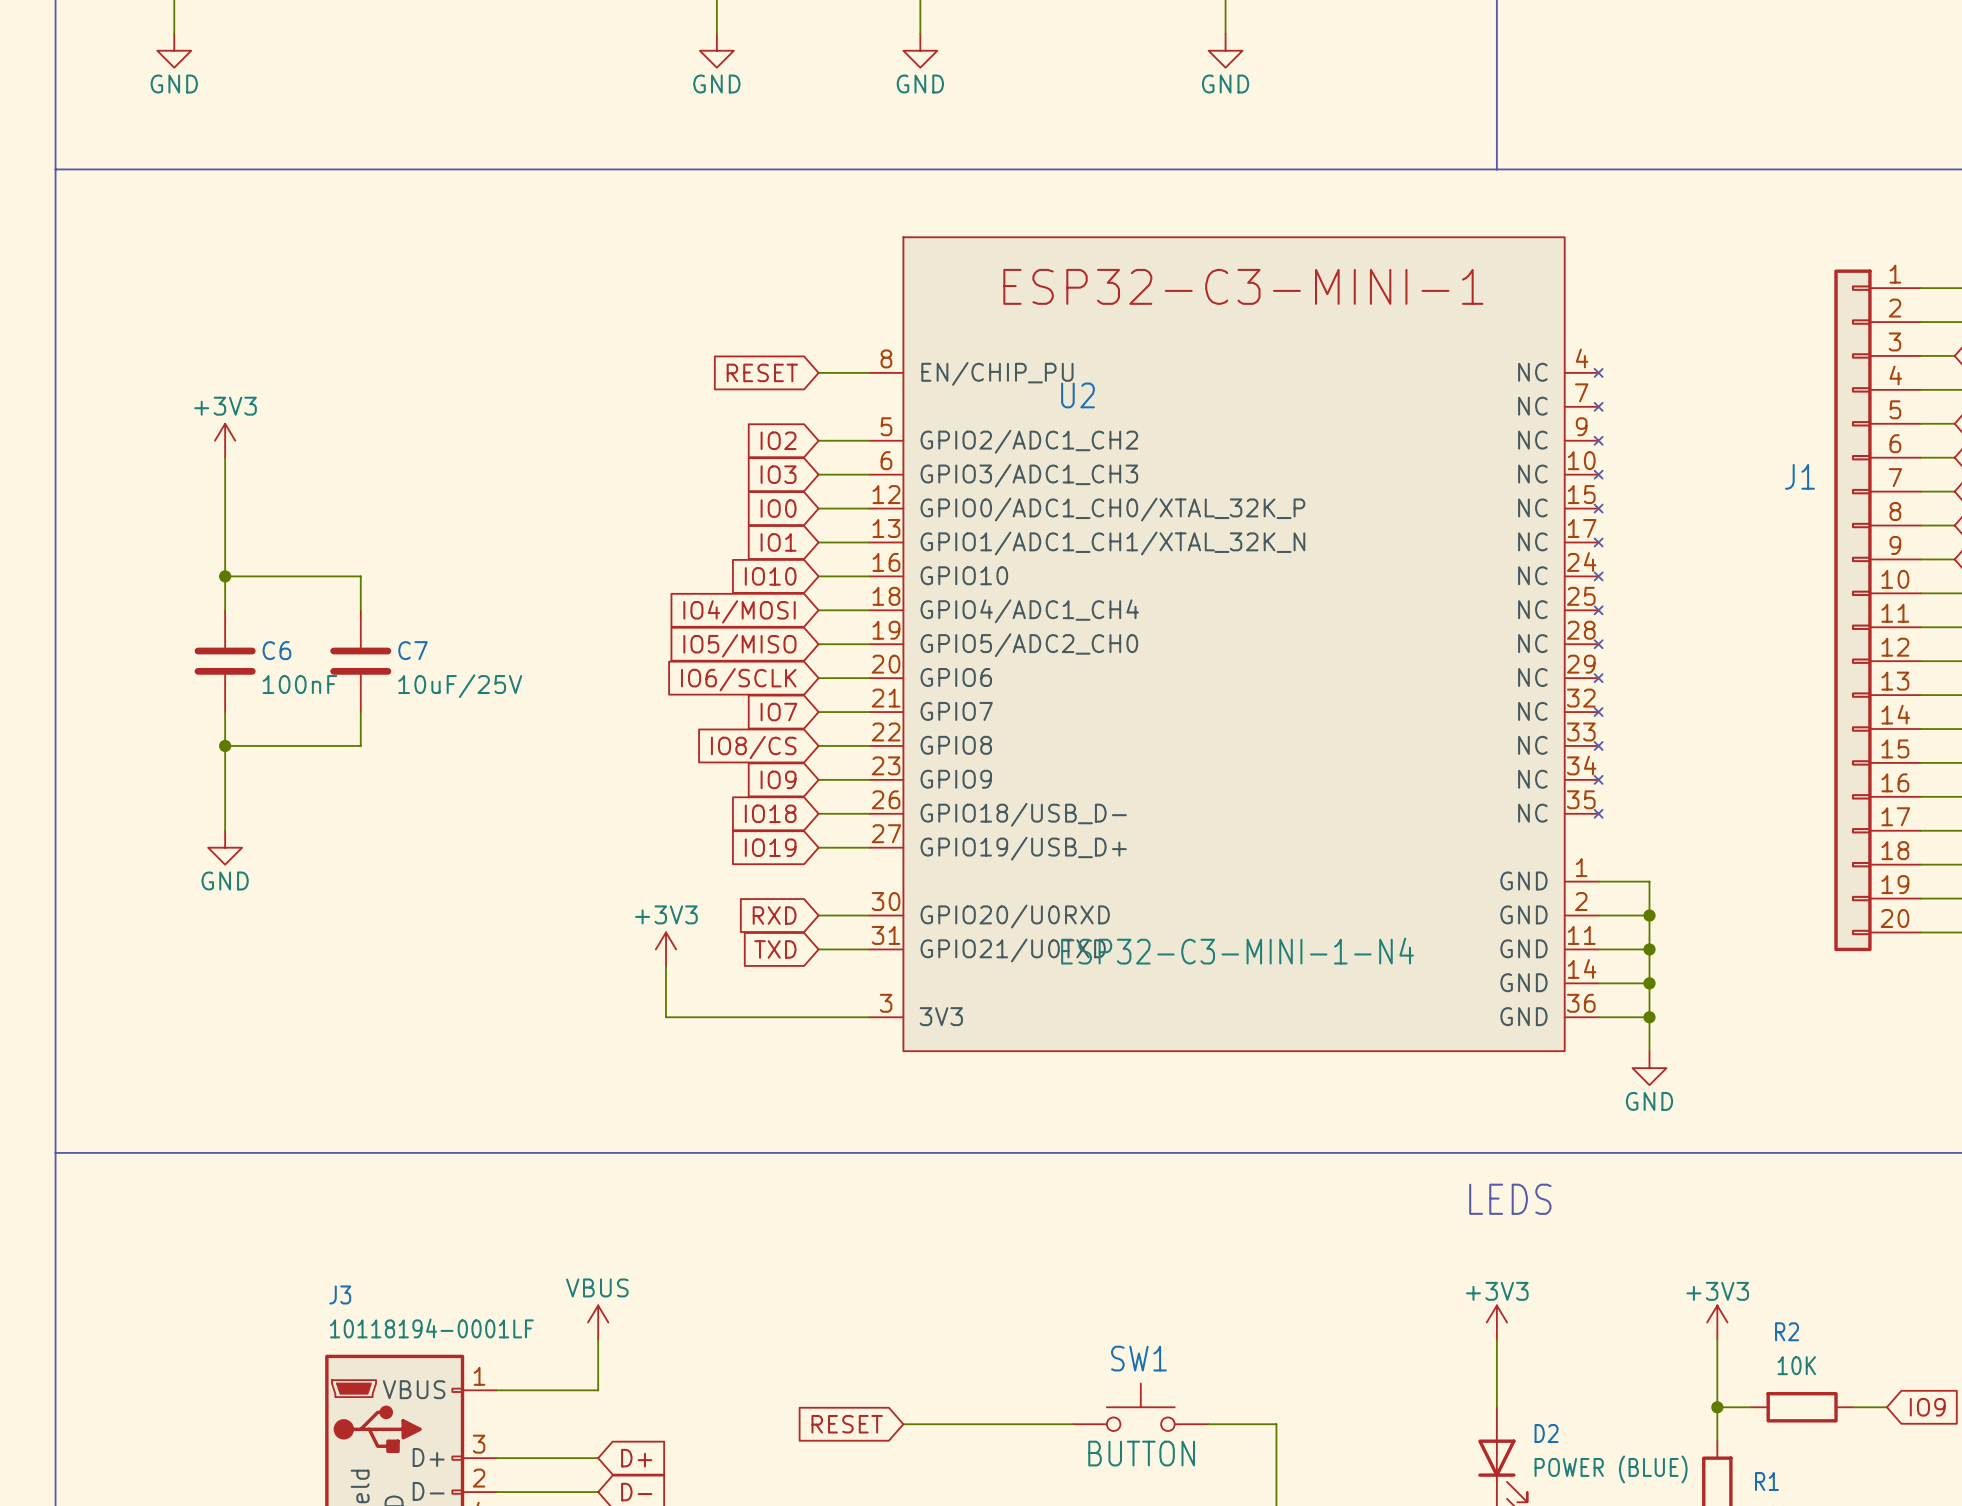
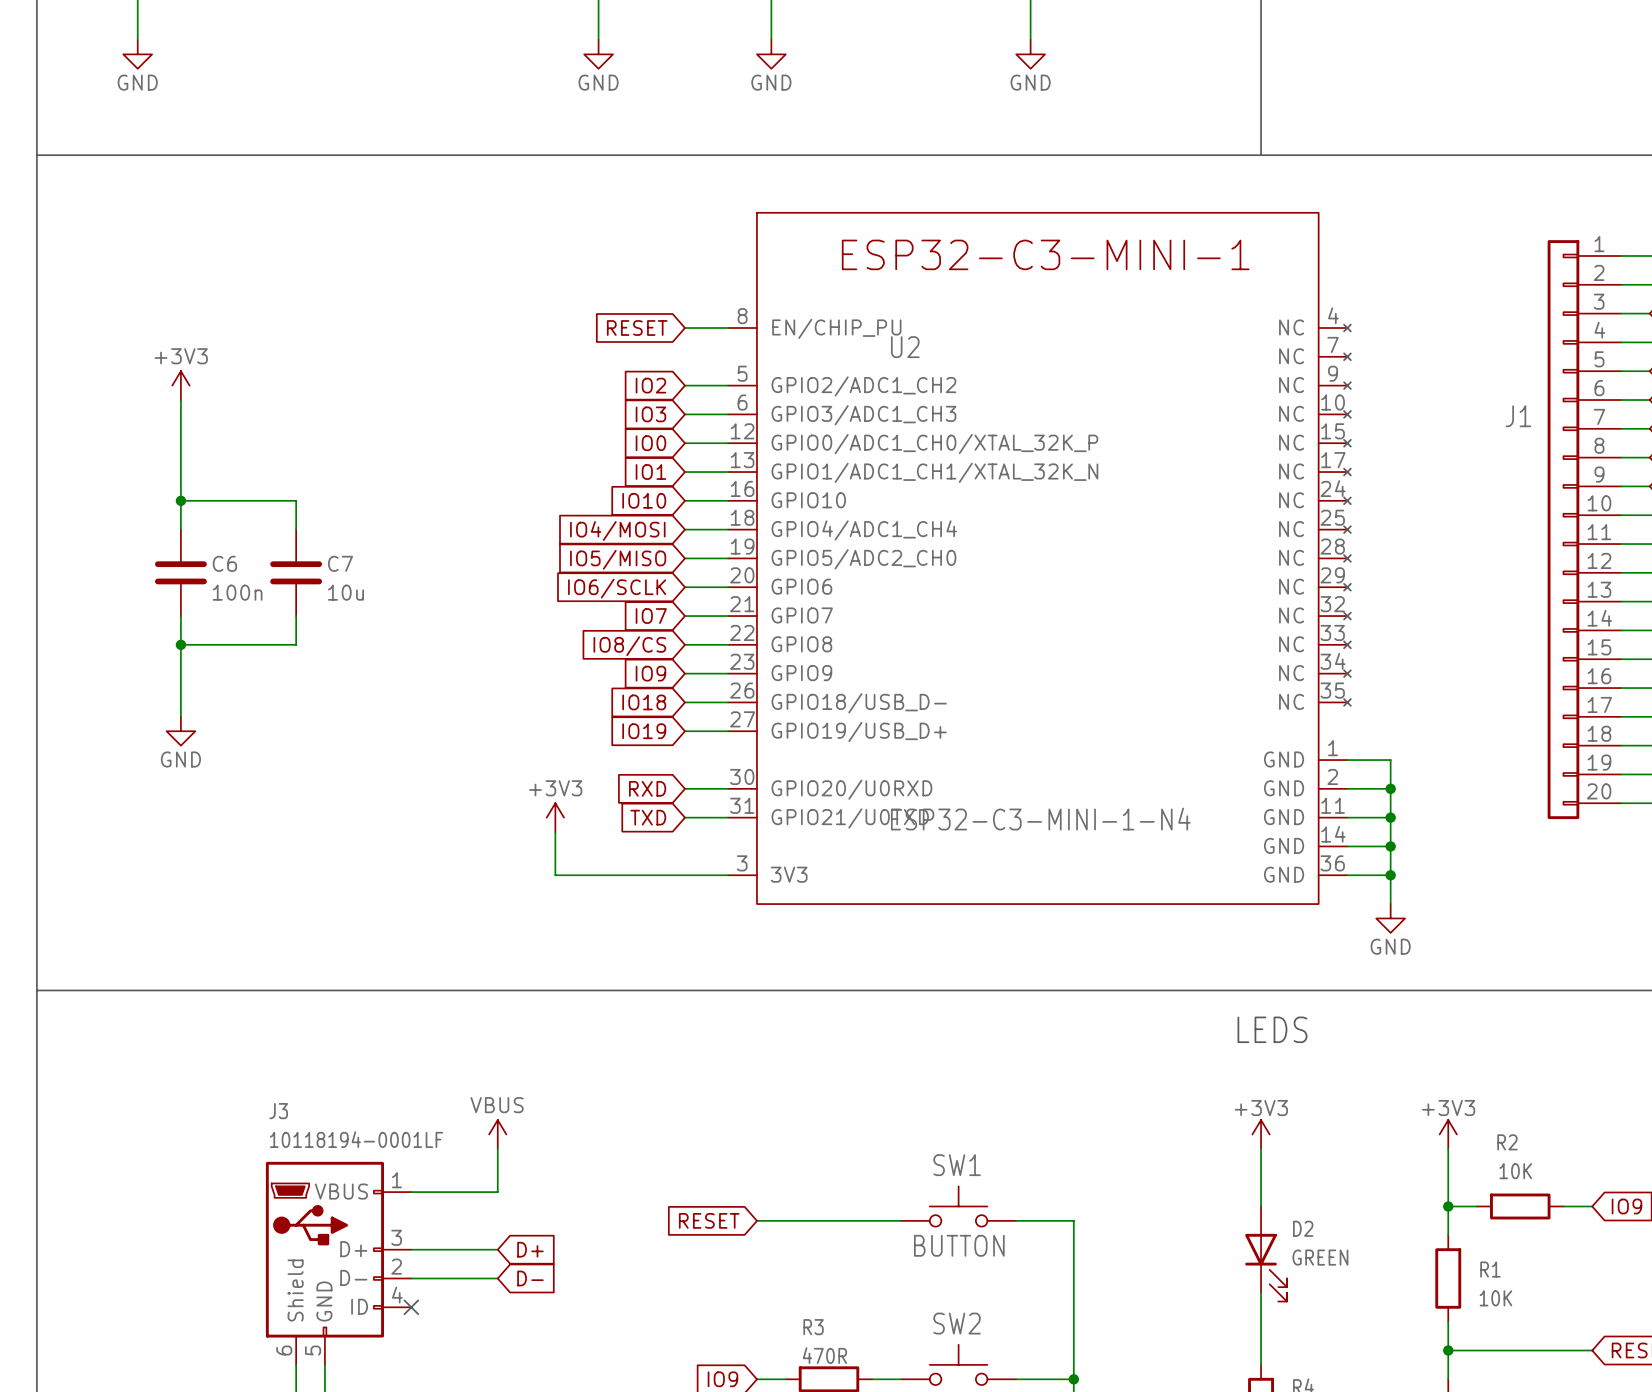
C6 value: 100nF (299, 684) -> 100n (237, 592)
C7 value: 10uF/25V (460, 686) -> 10u (345, 592)
D2 value: POWER (BLUE) (1611, 1469) -> GREEN (1320, 1257)

